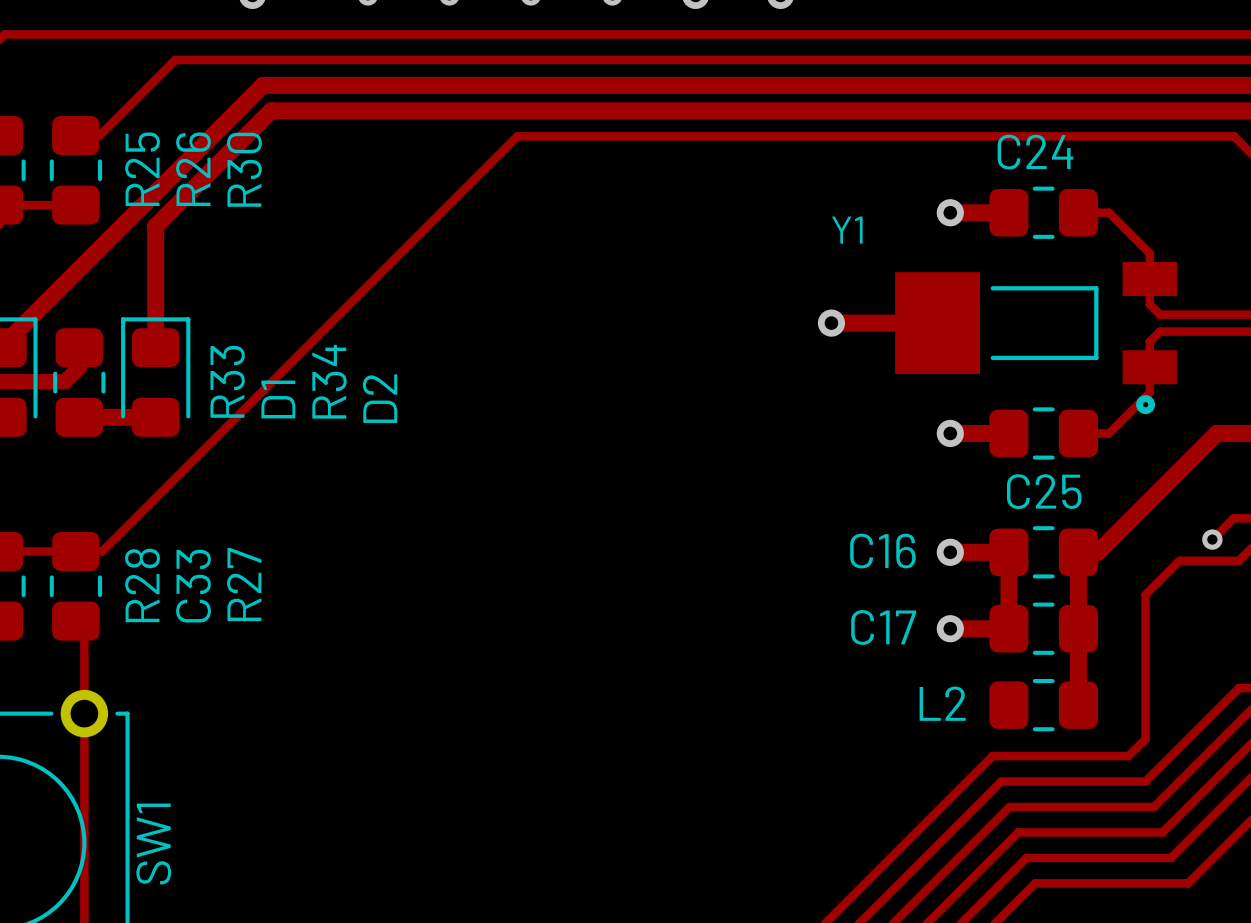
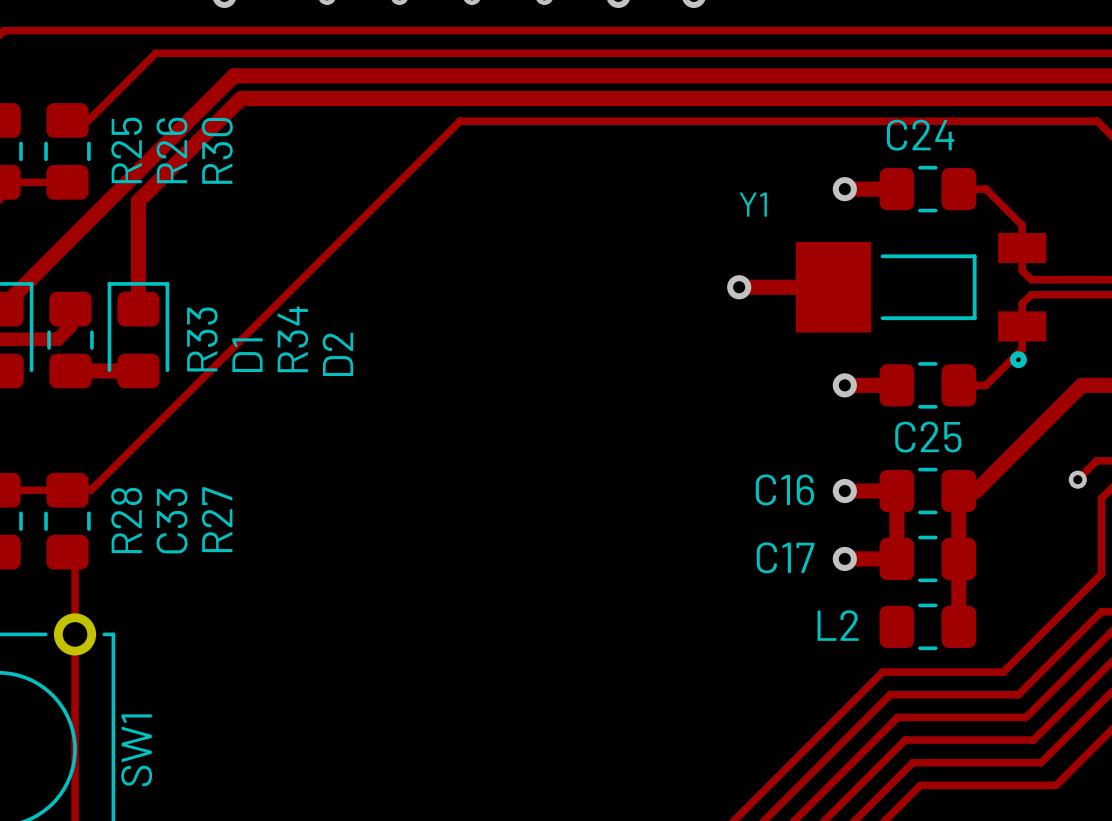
track: (1238, 560) (1179, 560) (1145, 594) (1145, 739) -> (1101, 498) (1101, 574) (1018, 657)

